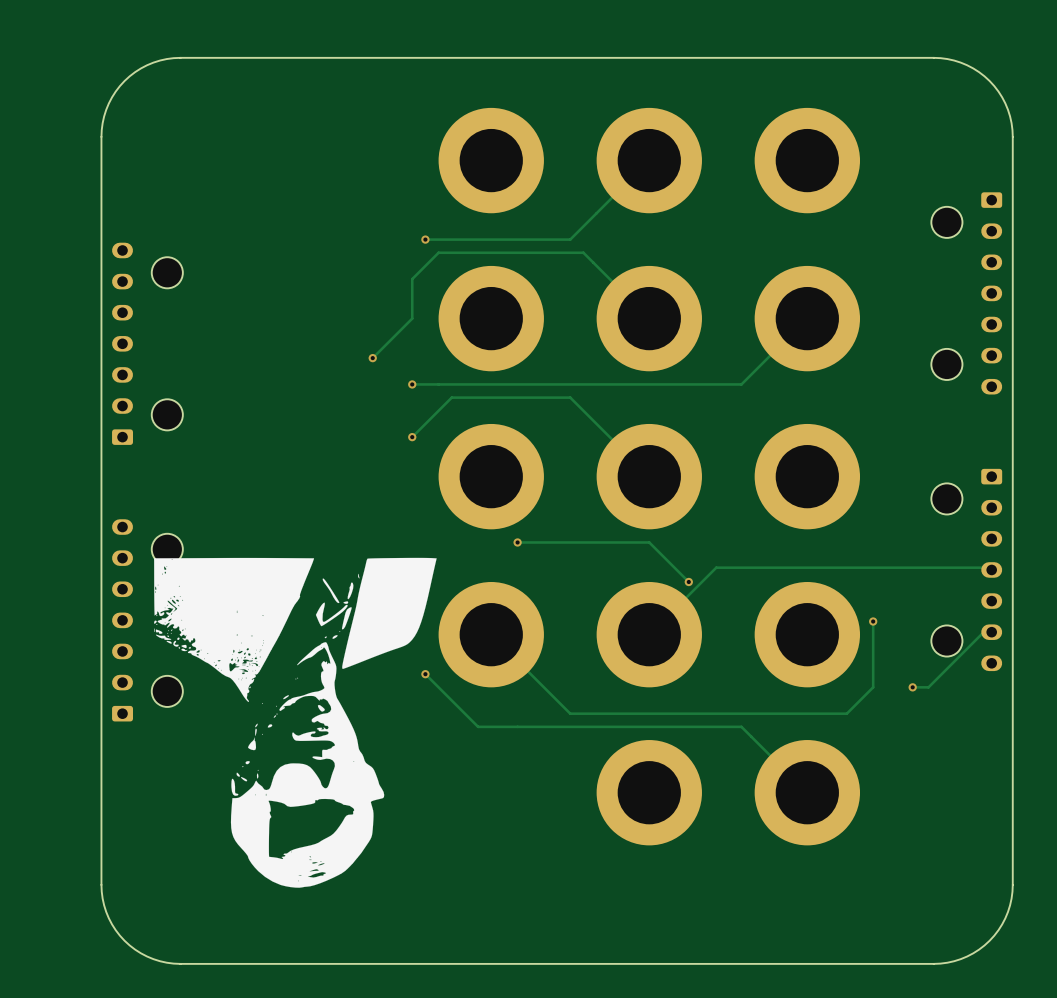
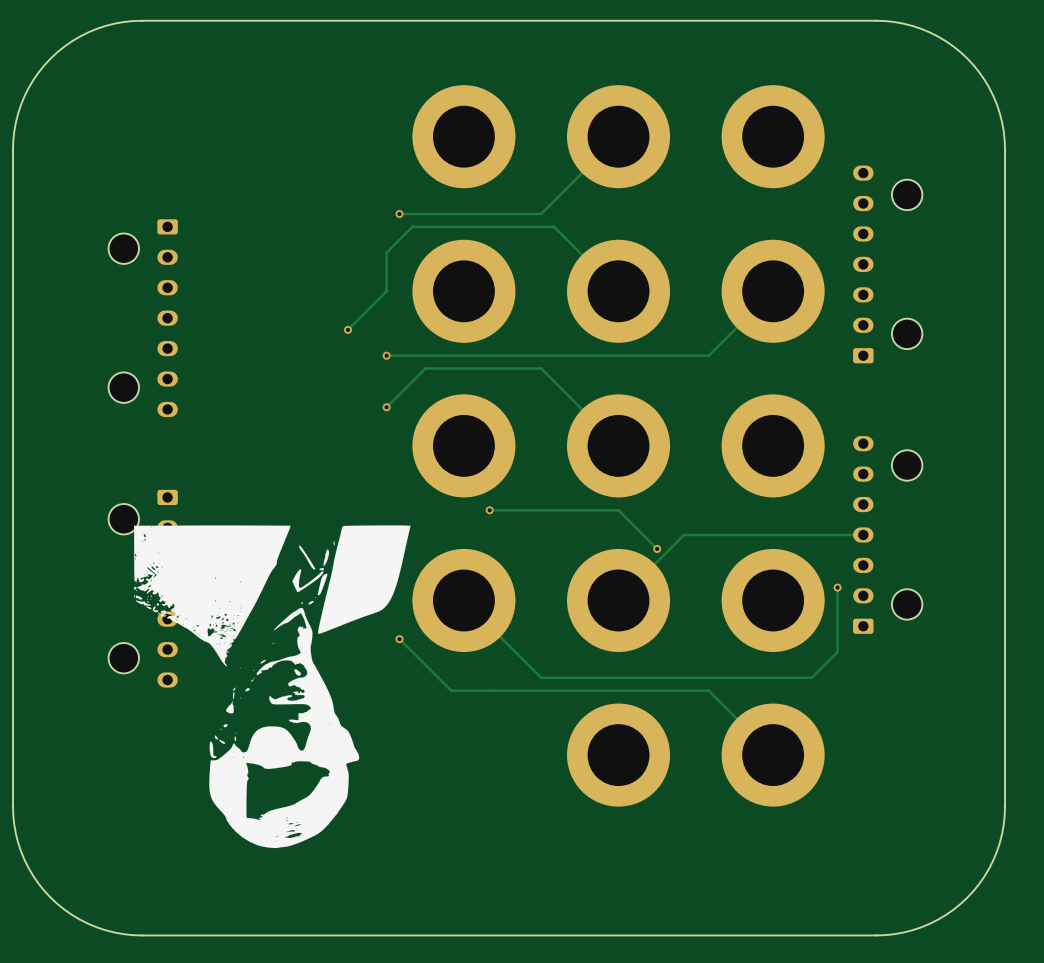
board edge: (933, 57) (180, 57) (160, 60) (147, 65) (129, 76) (119, 86) (106, 109) (101, 136) (101, 884) (104, 905) (108, 918) (119, 935) (129, 945) (153, 959) (180, 963) (933, 963) (954, 961) (967, 956) (984, 945) (994, 935) (1008, 911) (1012, 884) (1012, 129) (1005, 103) (989, 80) (979, 72) (960, 62) (933, 57) -> (876, 20) (903, 23) (929, 32) (953, 46) (967, 58) (984, 79) (993, 96) (1002, 122) (1004, 140) (1004, 815) (1002, 834) (993, 860) (984, 876) (967, 897) (945, 915) (929, 923) (903, 932) (876, 935) (132, 935) (114, 932) (88, 923) (72, 915) (50, 897) (33, 876) (21, 851) (15, 834) (13, 806) (13, 140) (18, 113) (24, 96) (33, 79) (50, 58) (72, 41) (88, 32) (114, 23) (132, 21) (876, 20)
part rotation: 0° (966, 293) -> 180° (887, 264)
part rotation: 0° (147, 343) -> 180° (143, 318)
track: (899, 567) (989, 567) (991, 569) -> none
part rotation: 0° (966, 569) -> 180° (887, 534)
part rotation: 0° (147, 620) -> 180° (143, 588)
track: (991, 632) (983, 632) (928, 687) (912, 687) -> none
via: (912, 687) -> none

